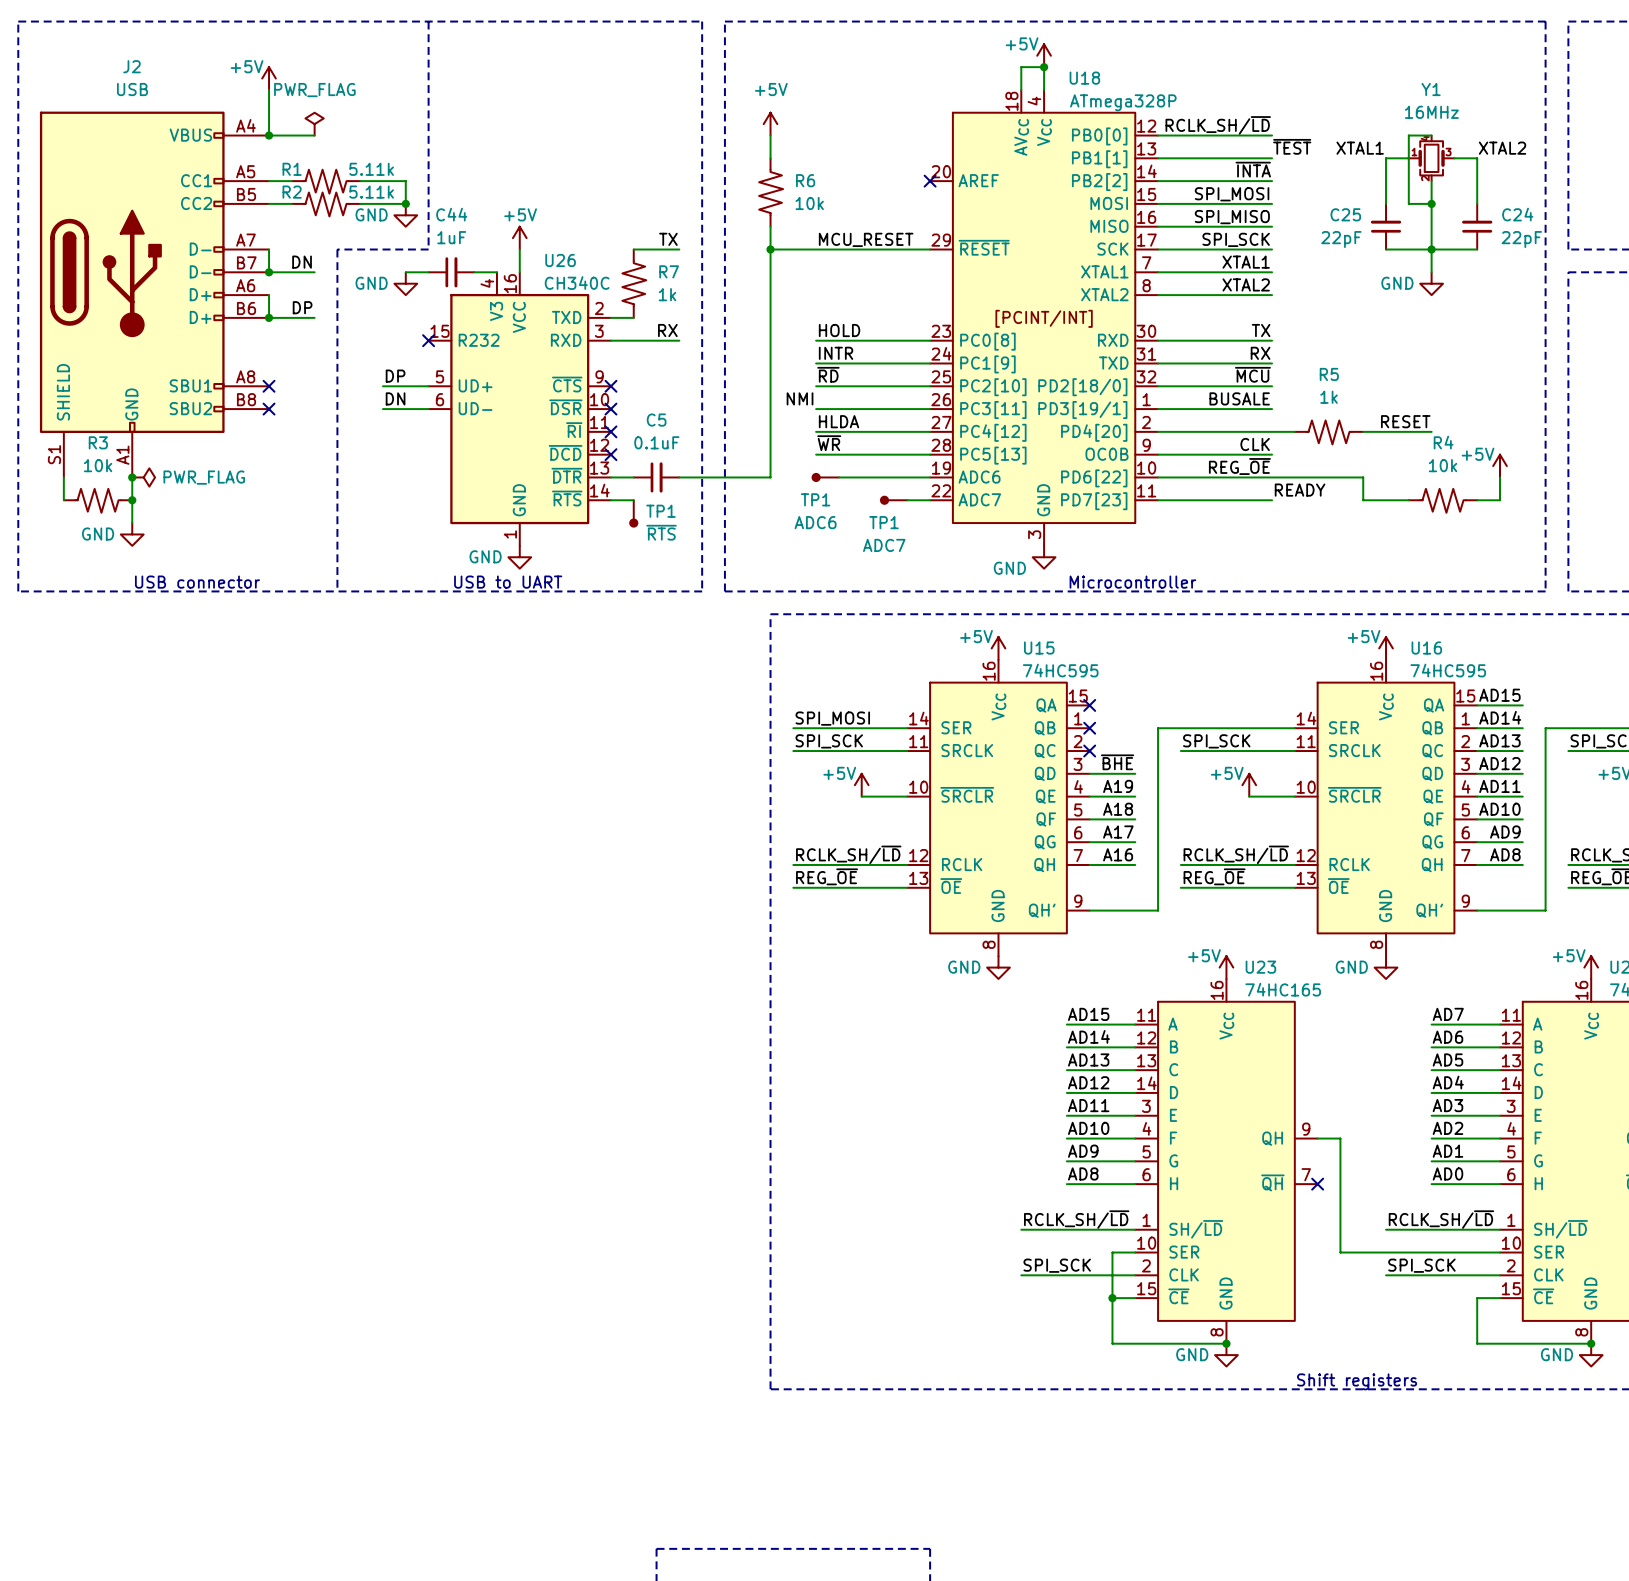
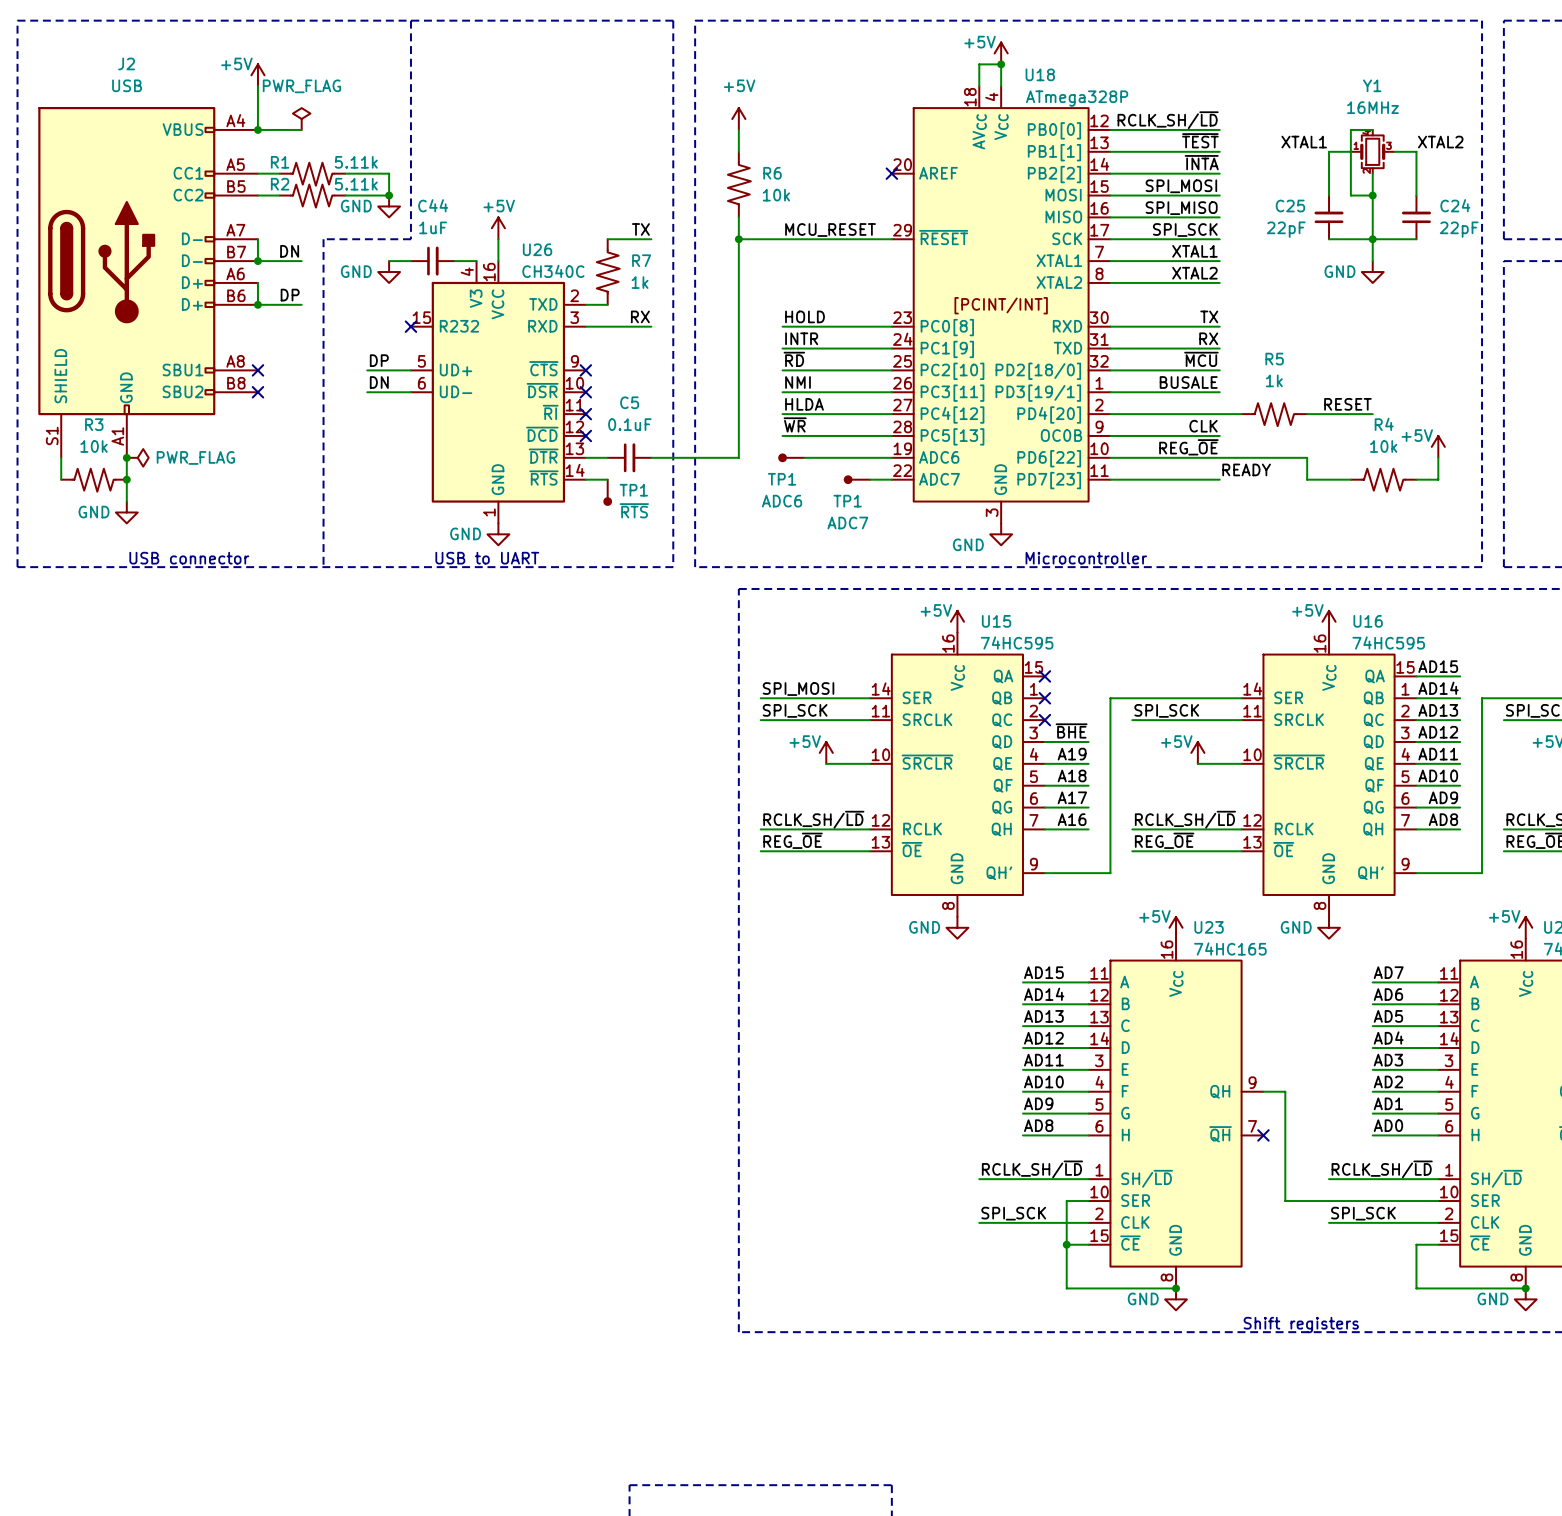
label position: ~{TEST} (1292, 146) -> ~{TEST} (1200, 140)
label position: NMI (800, 398) -> NMI (798, 382)

